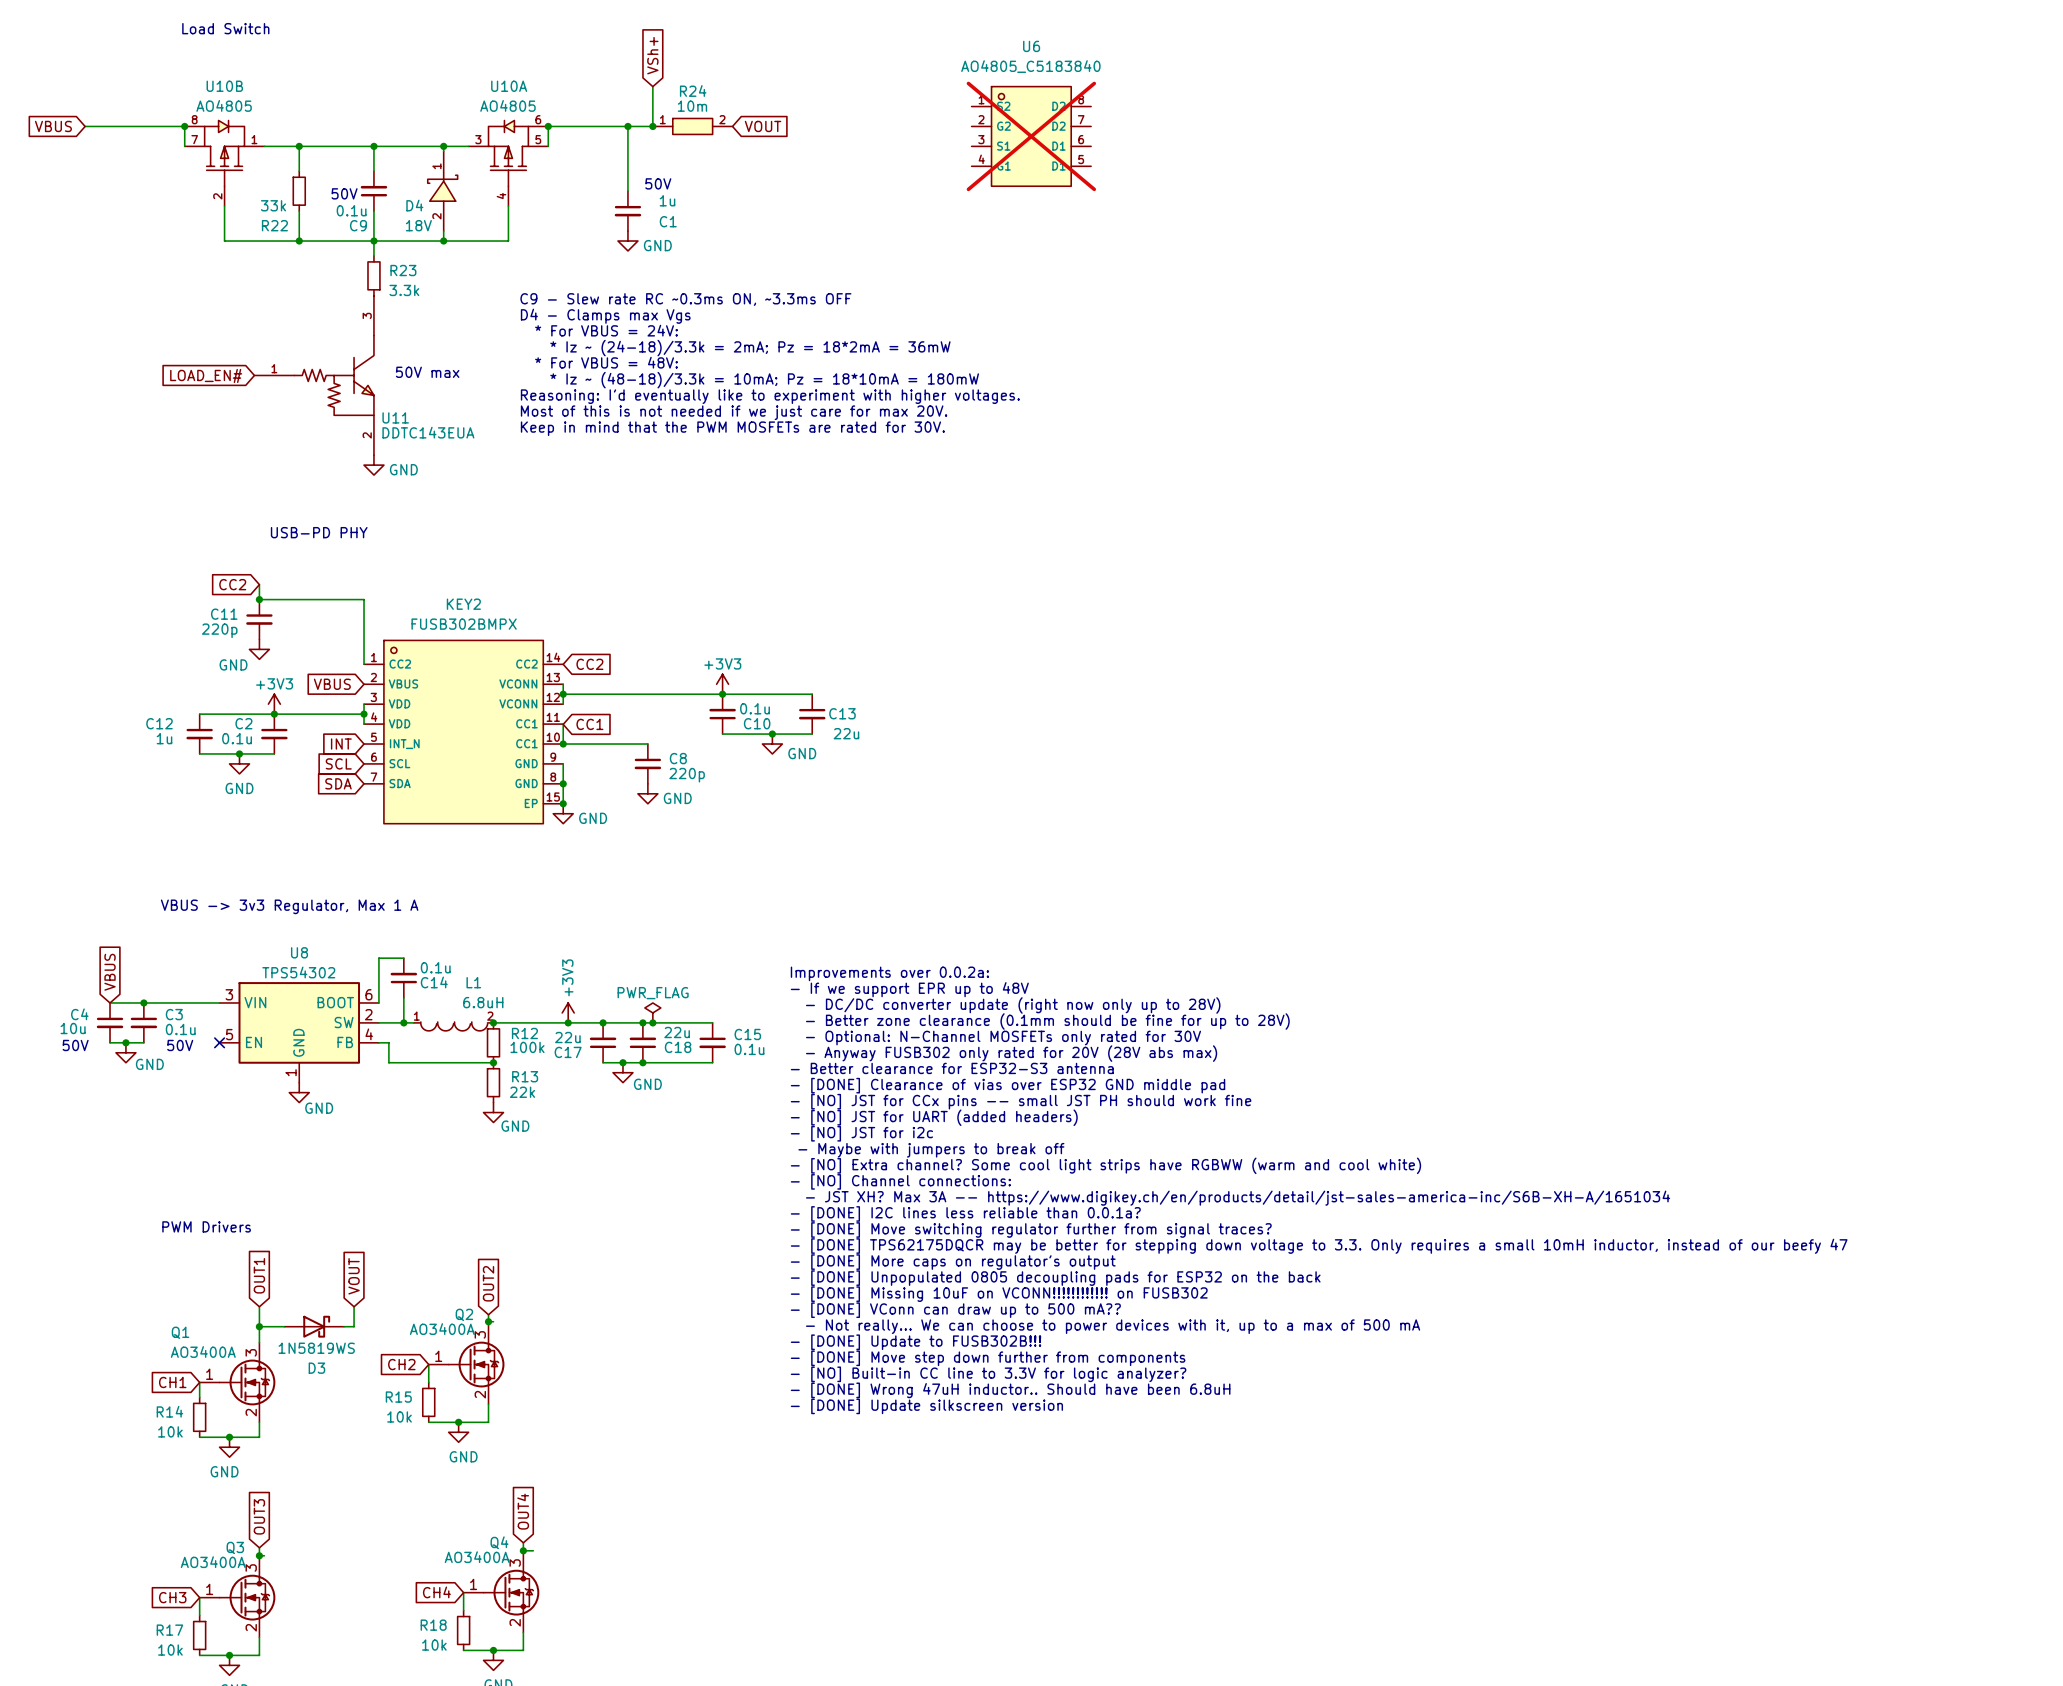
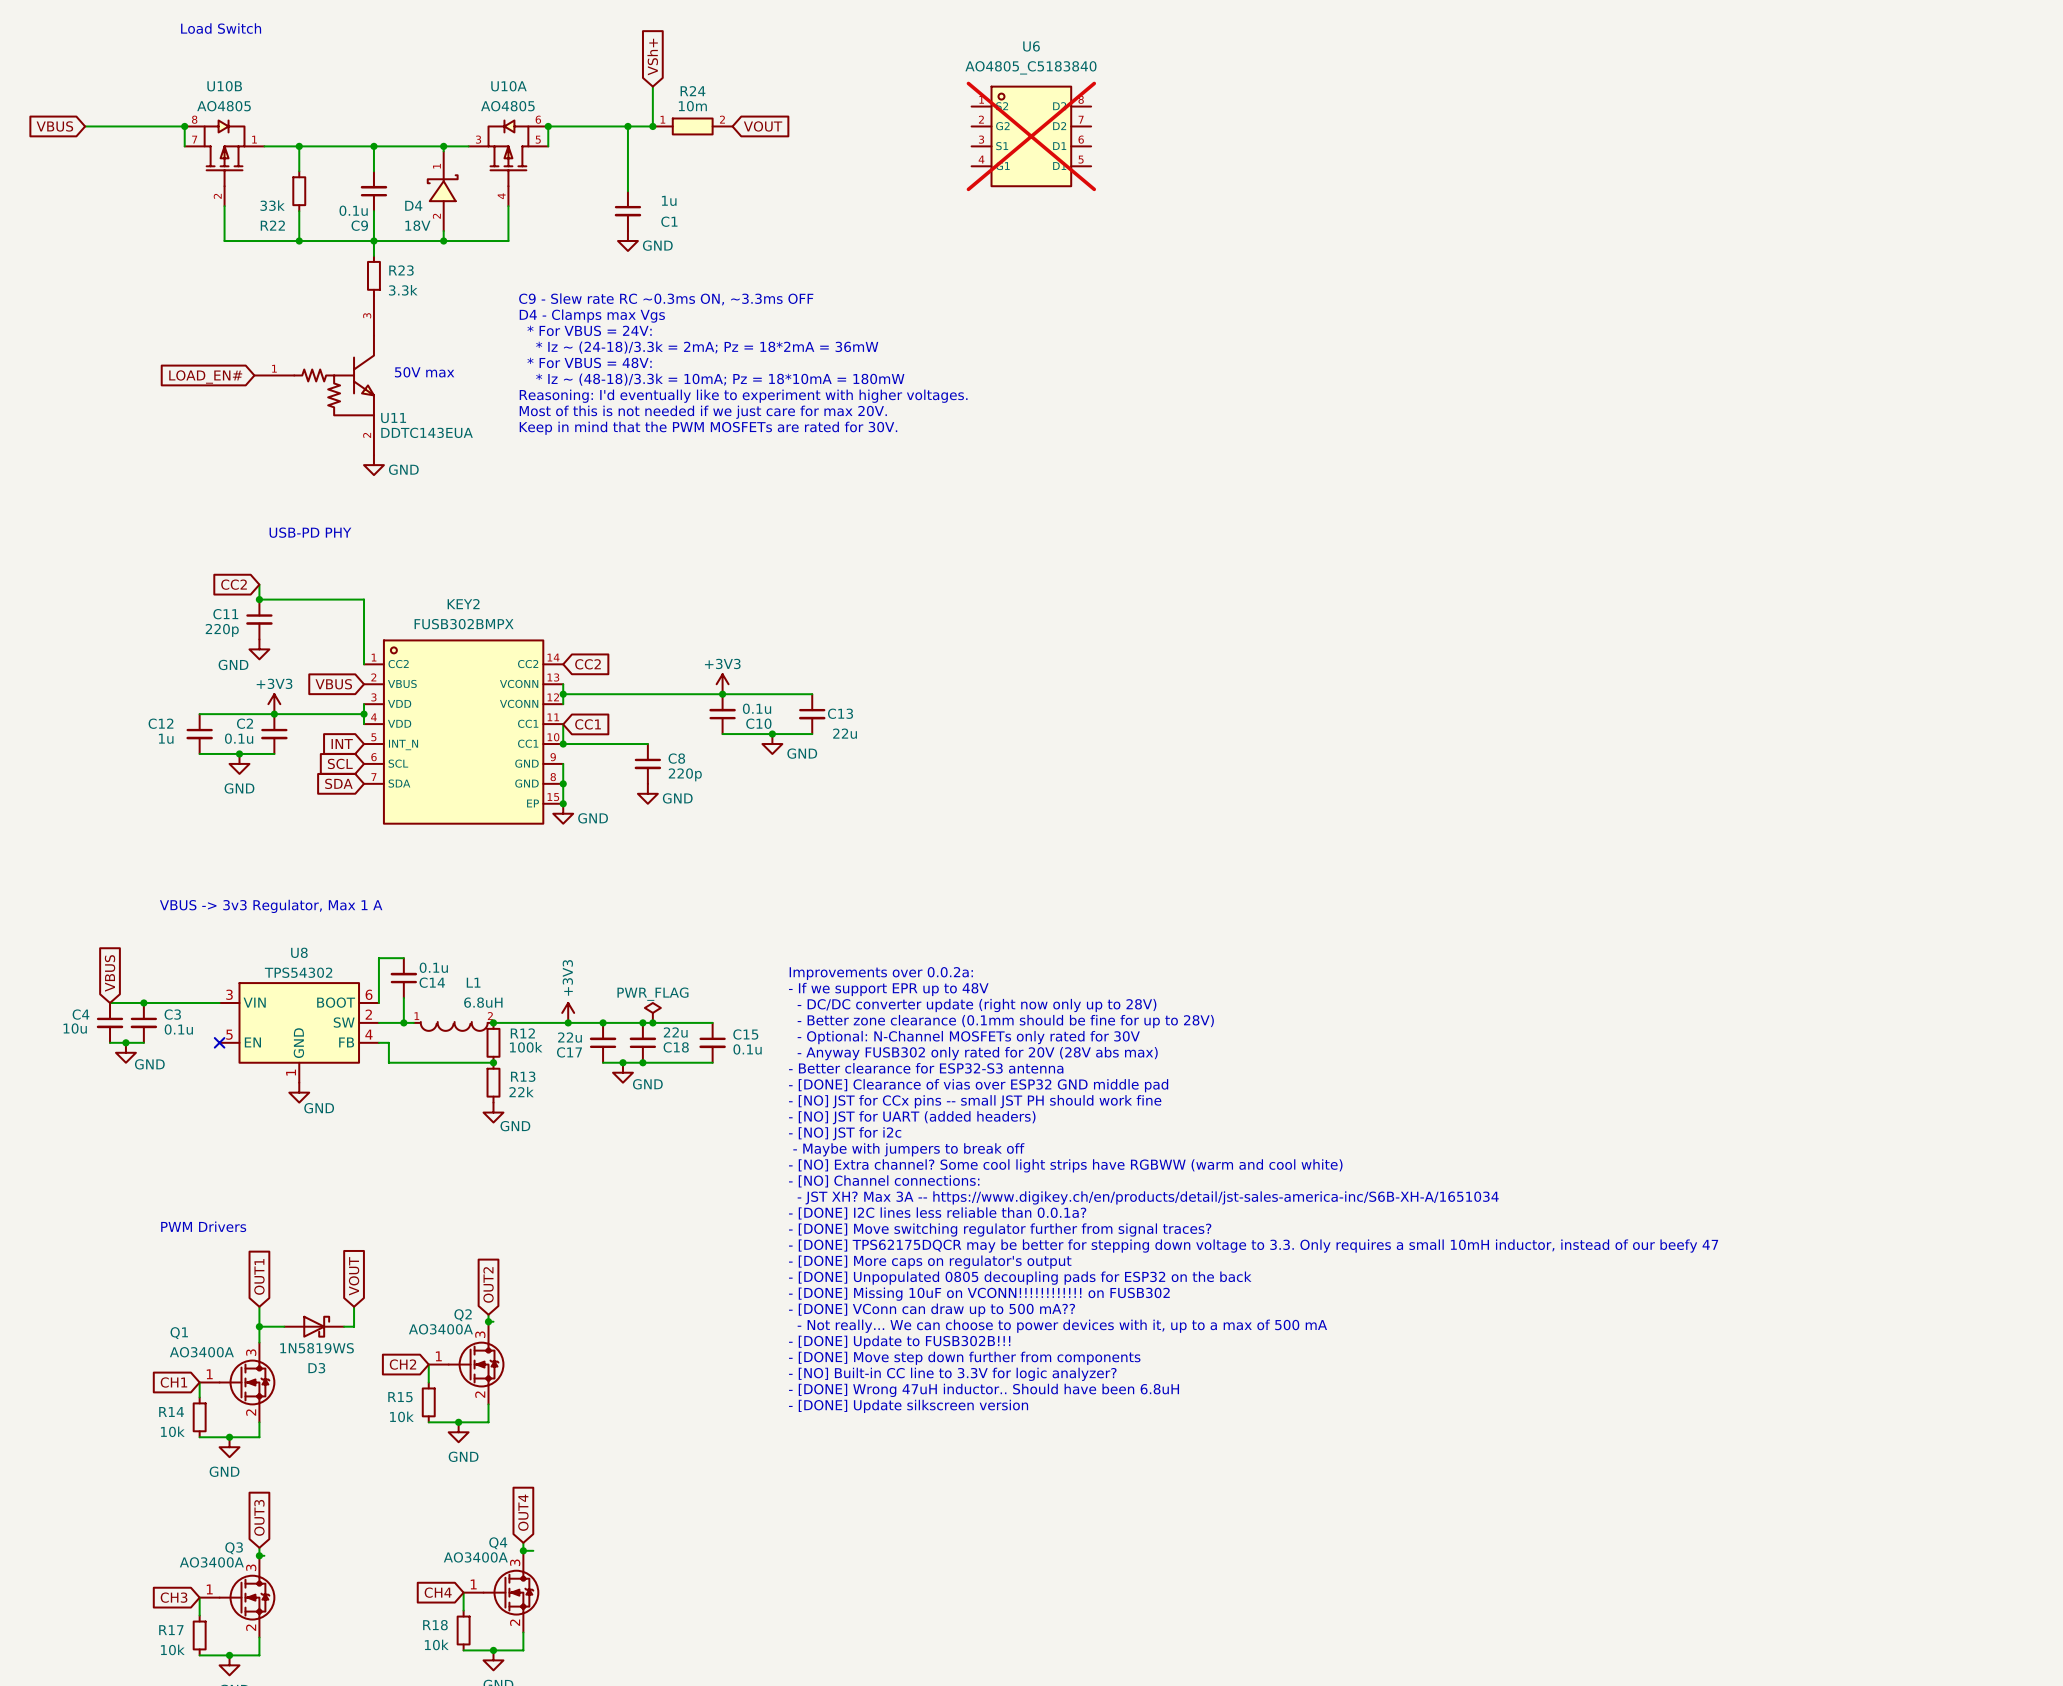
text: 50V (658, 183) -> none
text: 50V (344, 193) -> none
text: 50V (75, 1045) -> none
text: 50V (180, 1045) -> none

